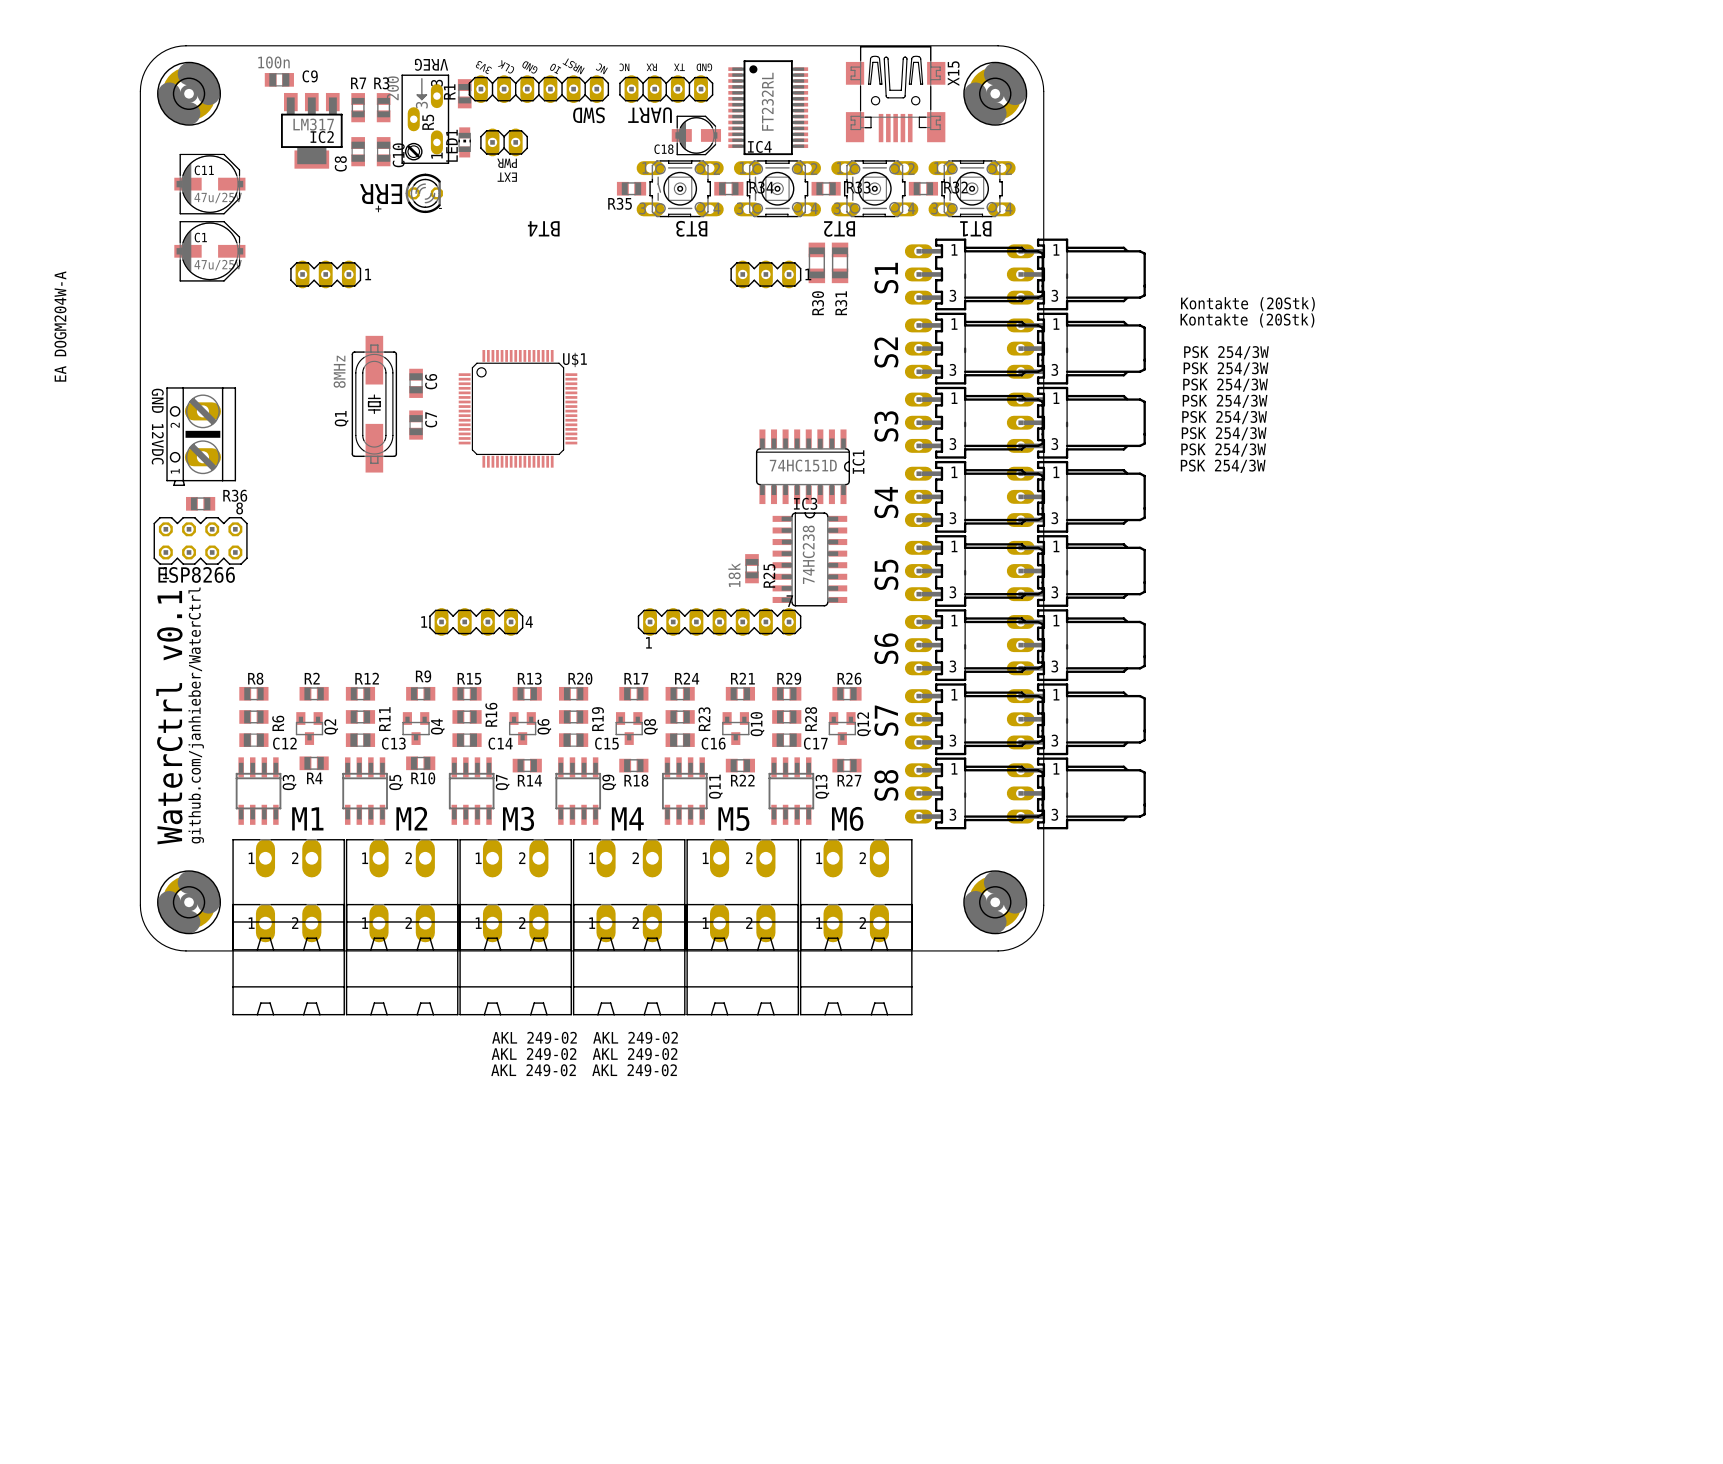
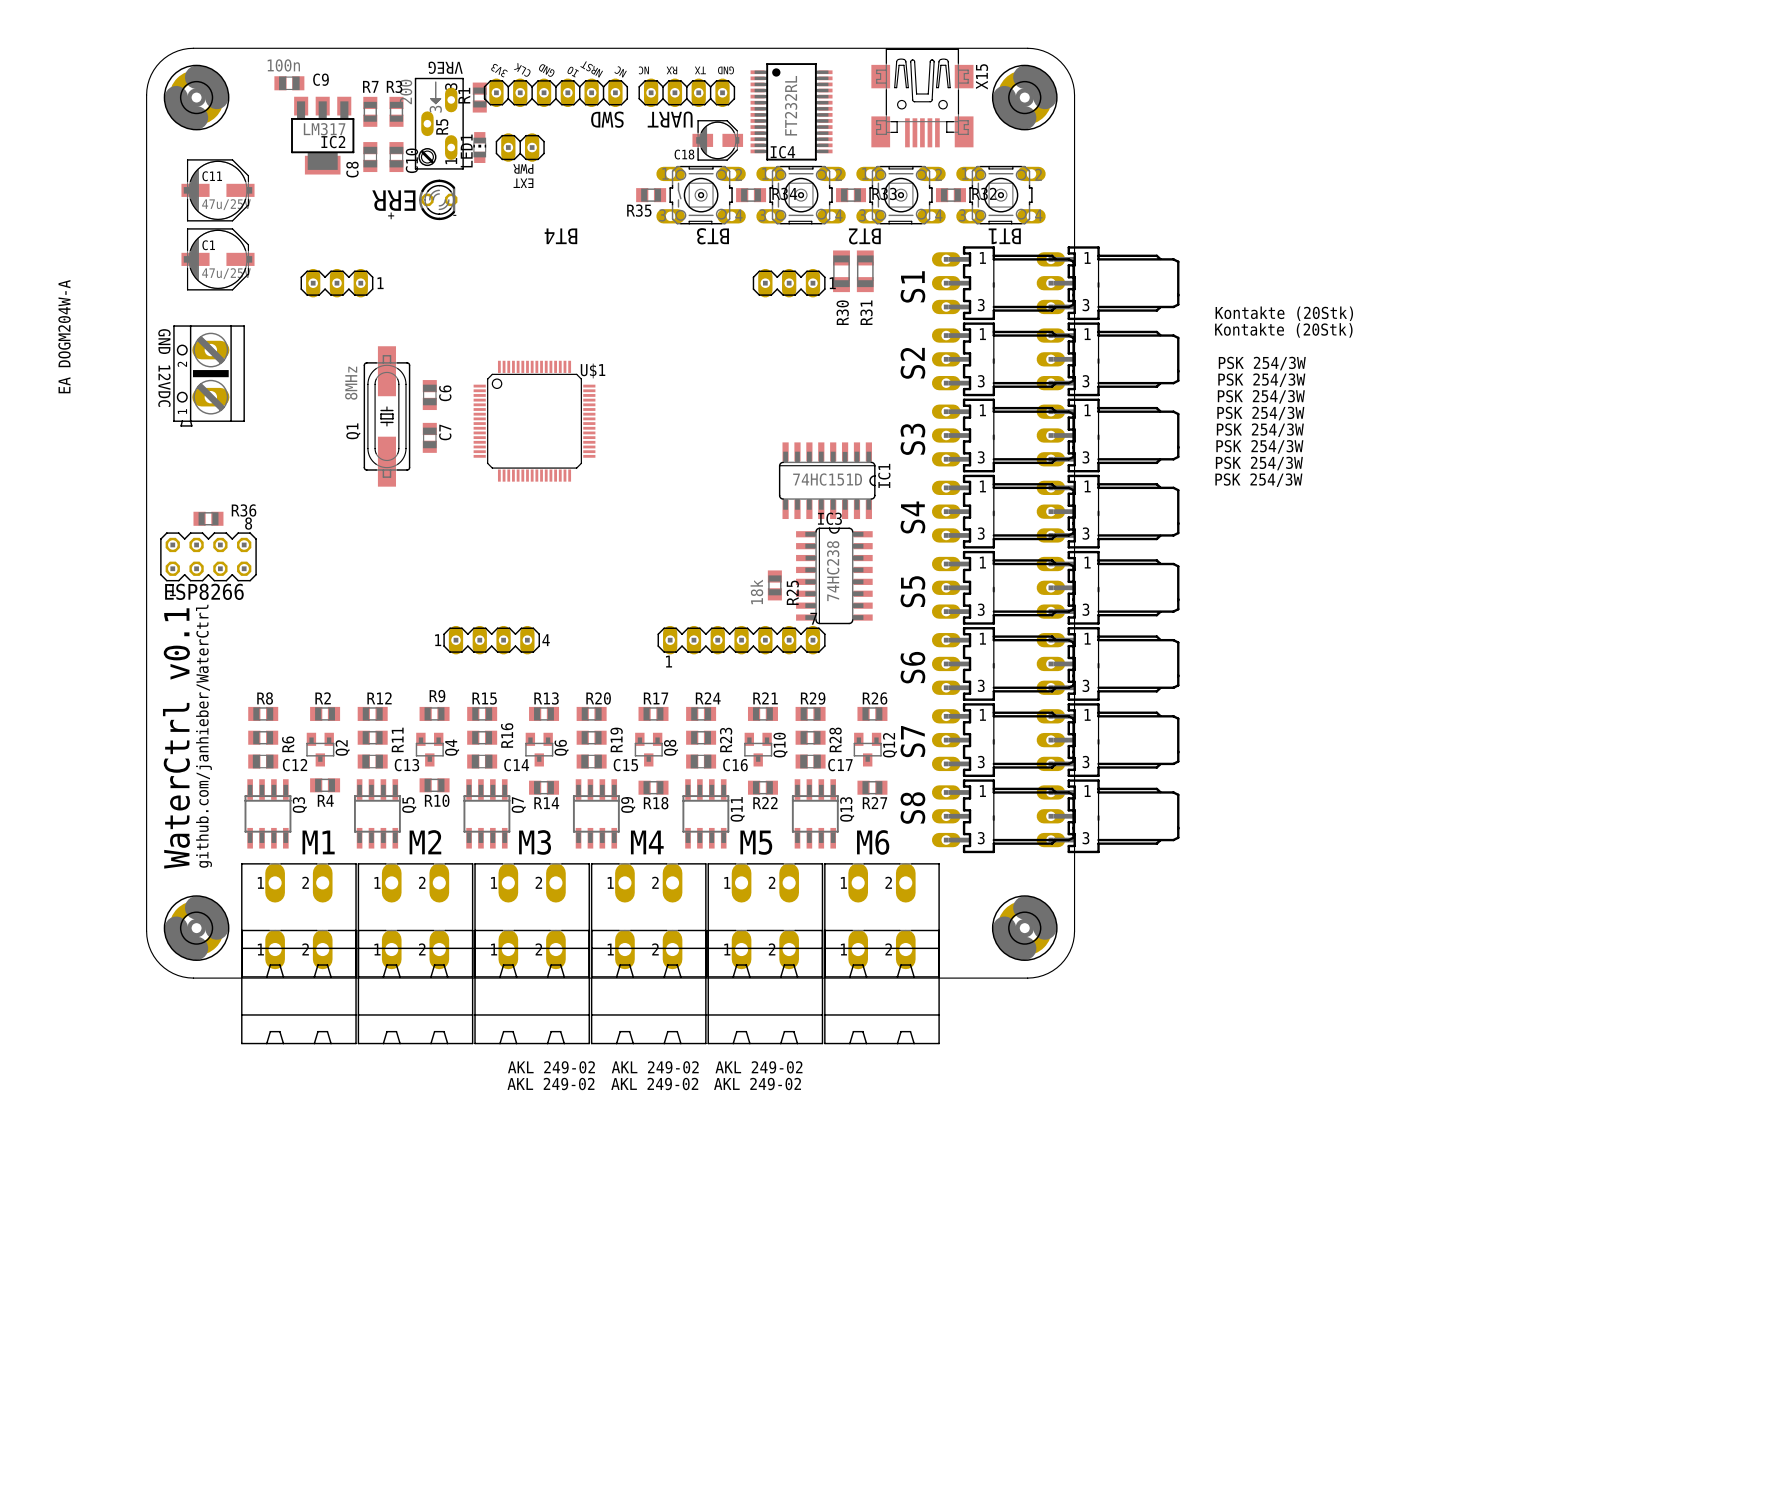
text position: GND 12VDC (157, 426) -> GND 12VDC (164, 367)
part position: (201, 436) -> (209, 375)
drawing: none -> [714, 1061, 803, 1091]
drawing: [491, 1064, 677, 1077] -> none

